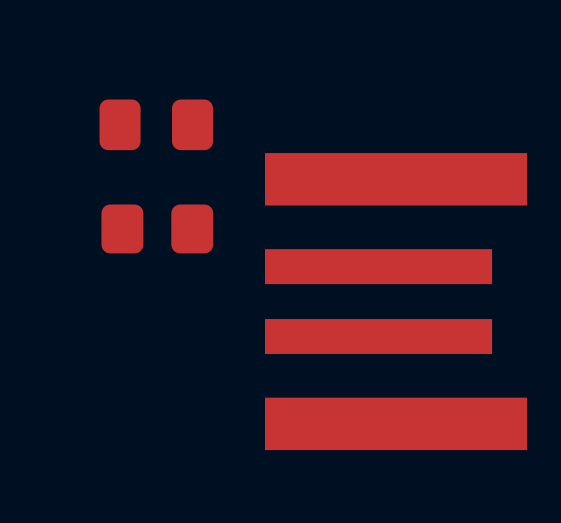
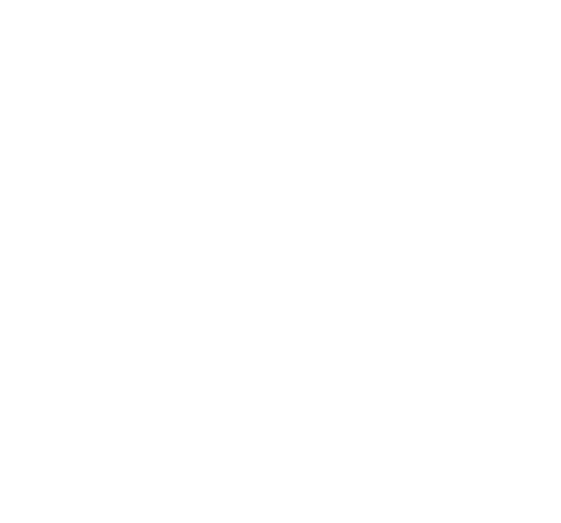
part: (156, 124) -> none
part: (157, 228) -> none
part: (396, 301) -> none

